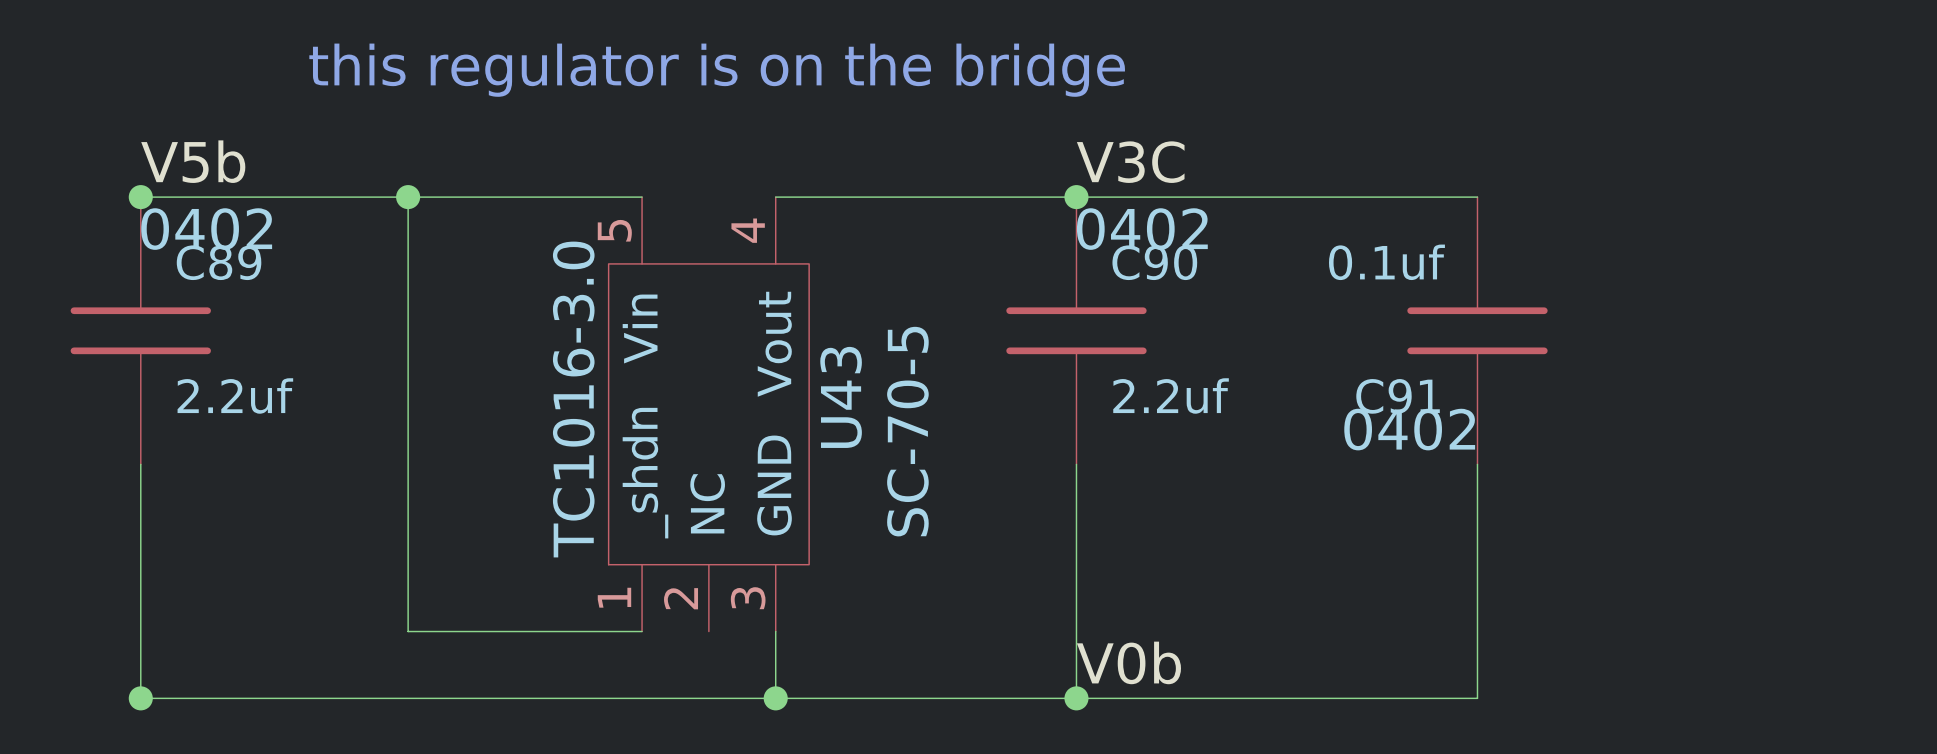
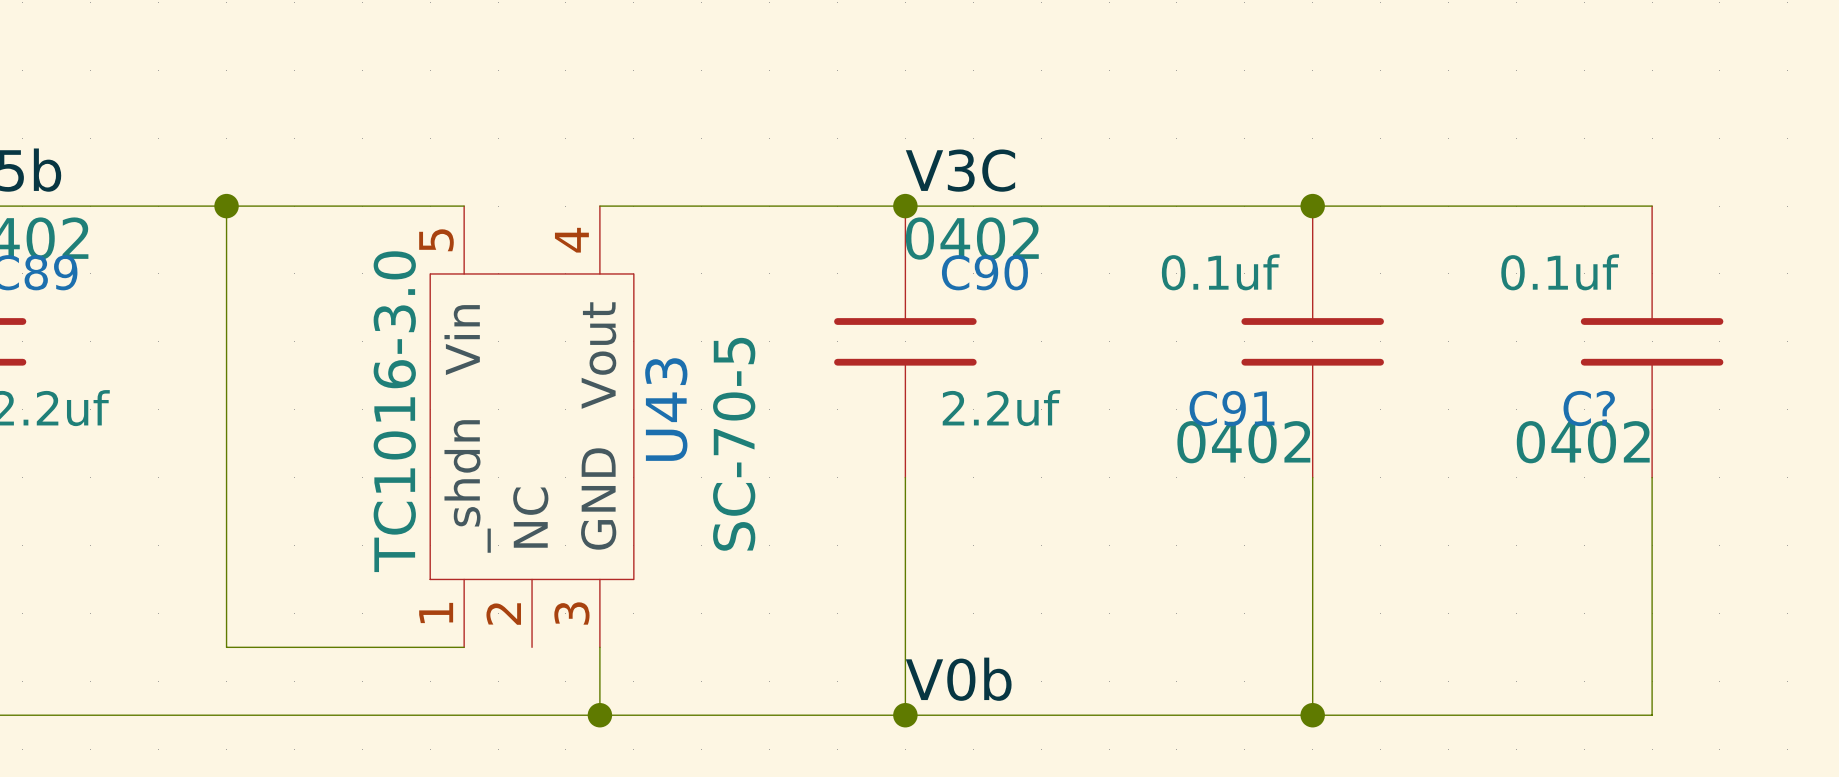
text: this regulator is on the bridge (717, 70) -> none
wire: none -> (1312, 206) (1652, 206)
junction: none -> (1312, 206)
C?: none -> 0.1uf (1652, 341)
wire: none -> (1652, 477) (1652, 715) (1312, 715)
junction: none -> (1312, 715)

